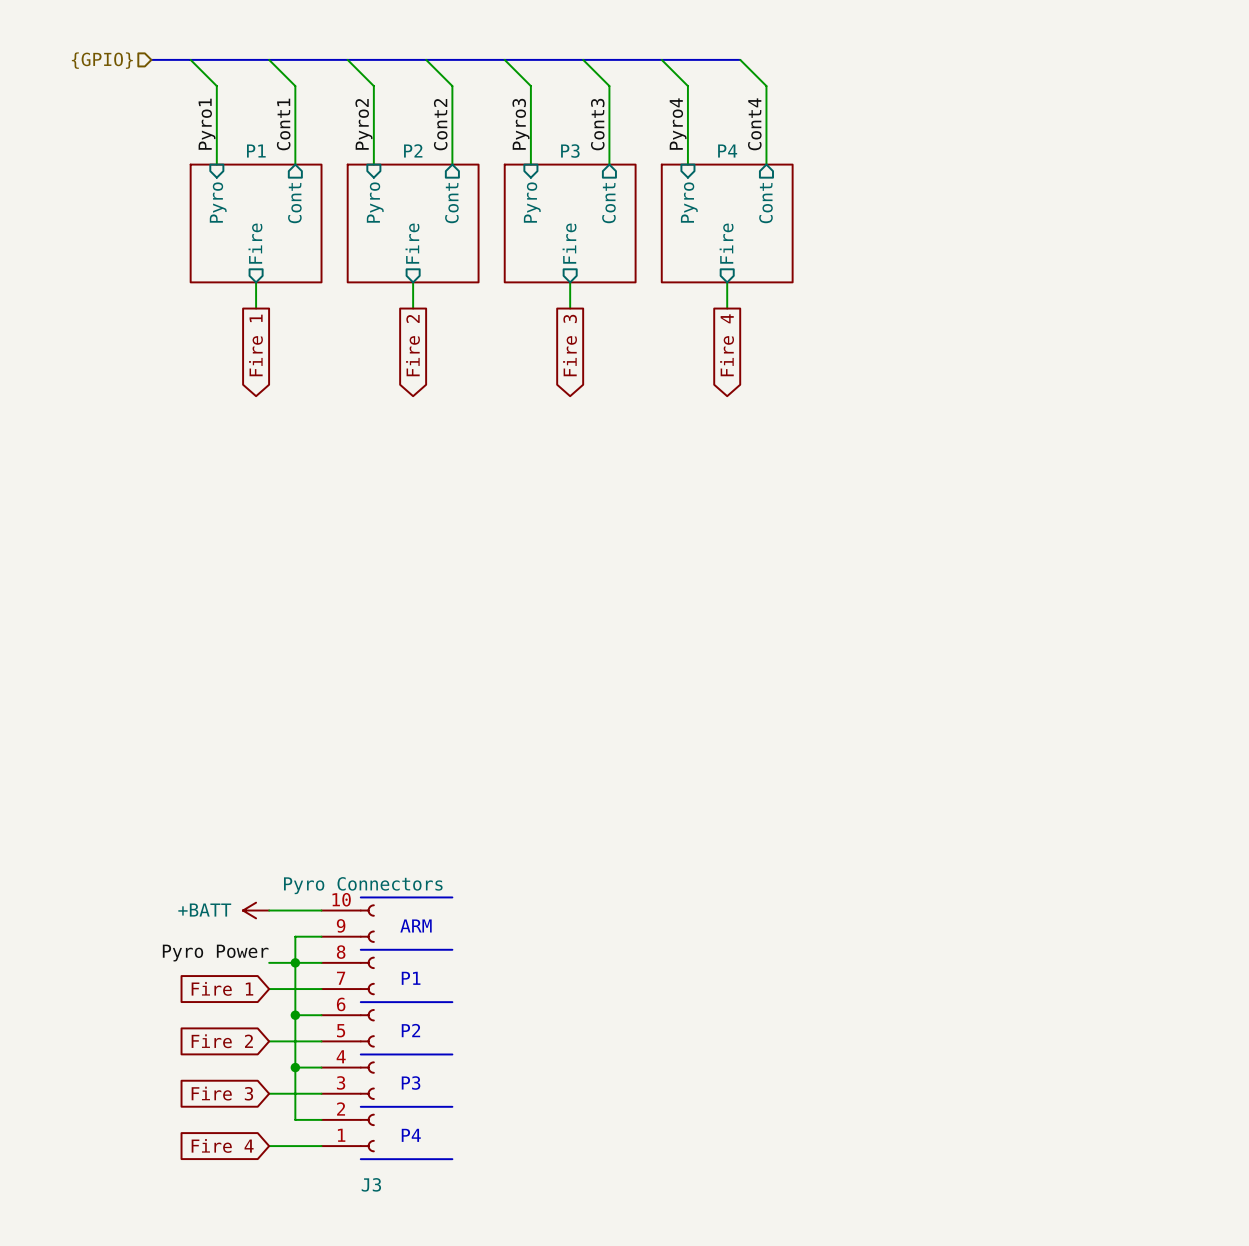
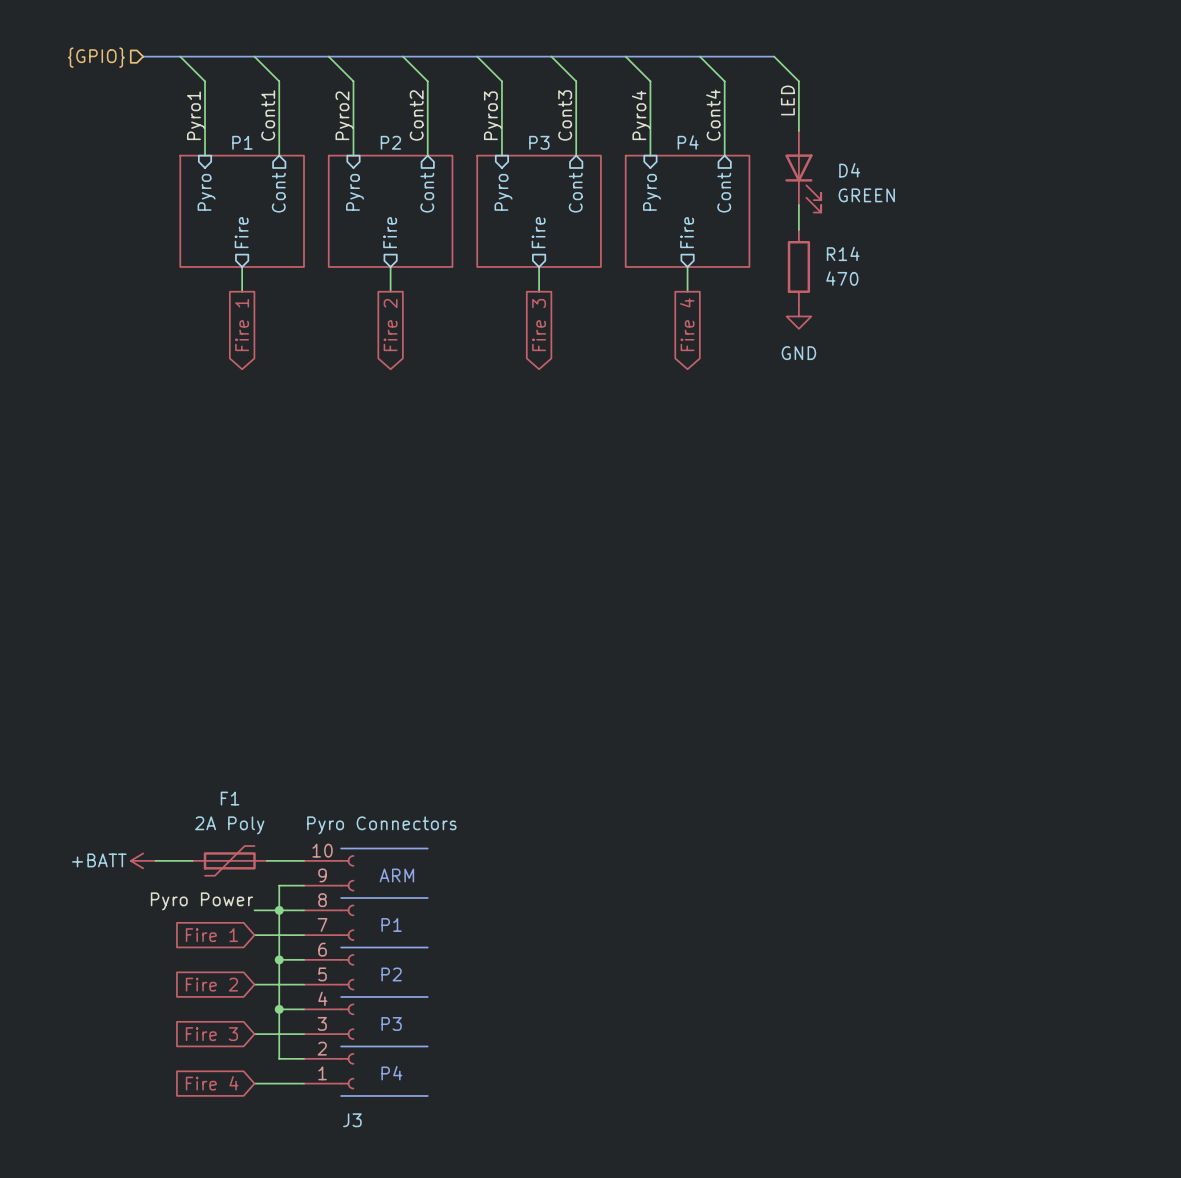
bus: none -> (699, 56) (774, 56)
wire: none -> (774, 56) (798, 81) (798, 130)
label: none -> LED (787, 100)
D4: none -> GREEN (803, 171)
wire: none -> (798, 205) (798, 229)
R14: none -> 470 (798, 266)
power symbol: none -> GND (798, 316)
J3 value position: Pyro Connectors (363, 885) -> Pyro Connectors (381, 825)
wire: none -> (155, 860) (192, 860)
F1: none -> 2A Poly (229, 860)
power symbol position: +BATT (256, 910) -> +BATT (143, 860)

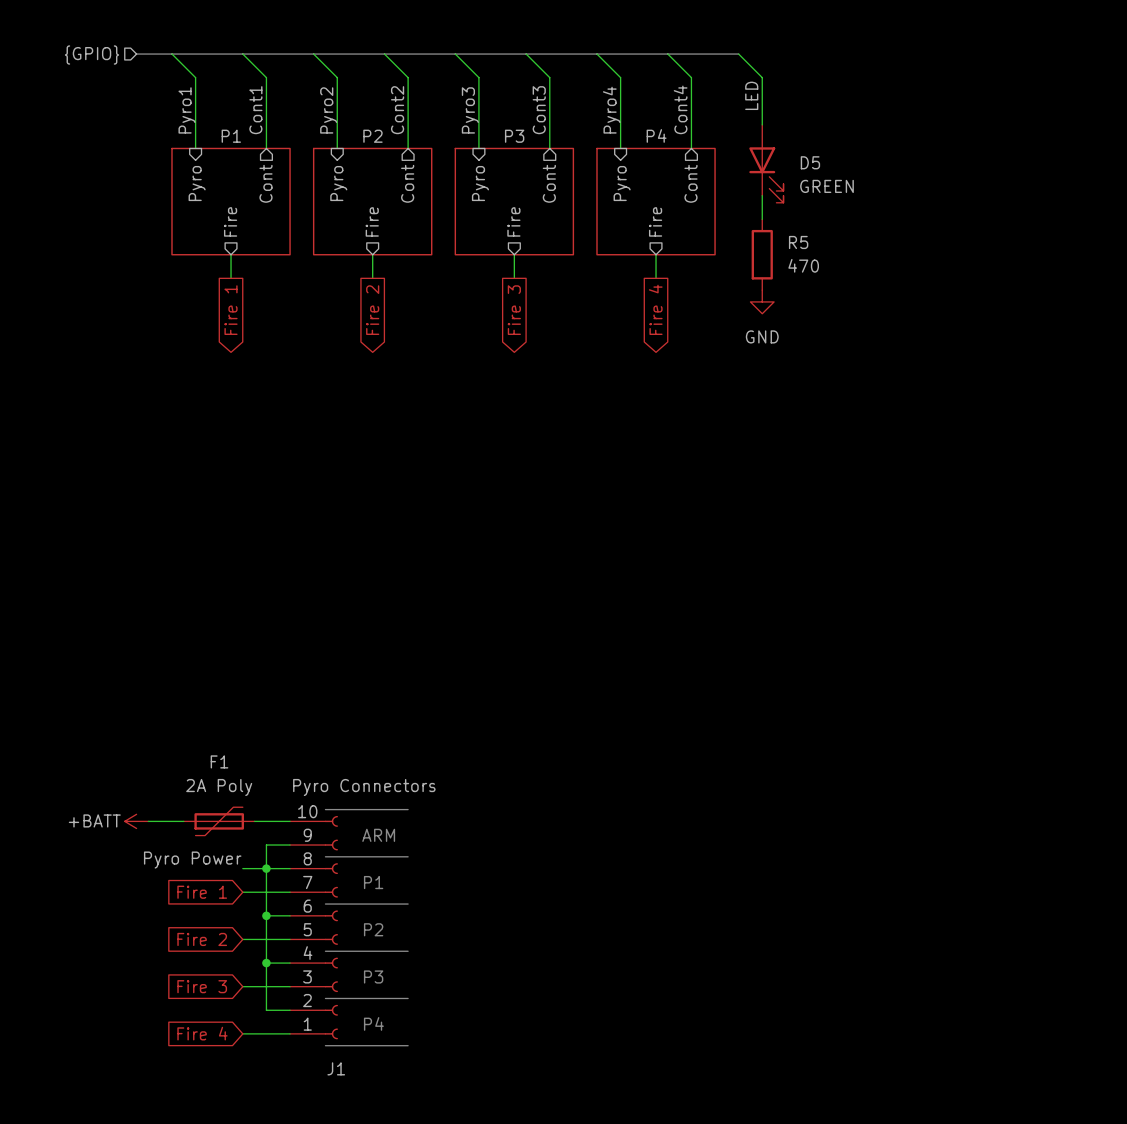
D4 name: D4 (849, 170) -> D5 (810, 162)
R14 name: R14 (843, 253) -> R5 (798, 242)
J3 name: J3 (352, 1120) -> J1 (336, 1068)

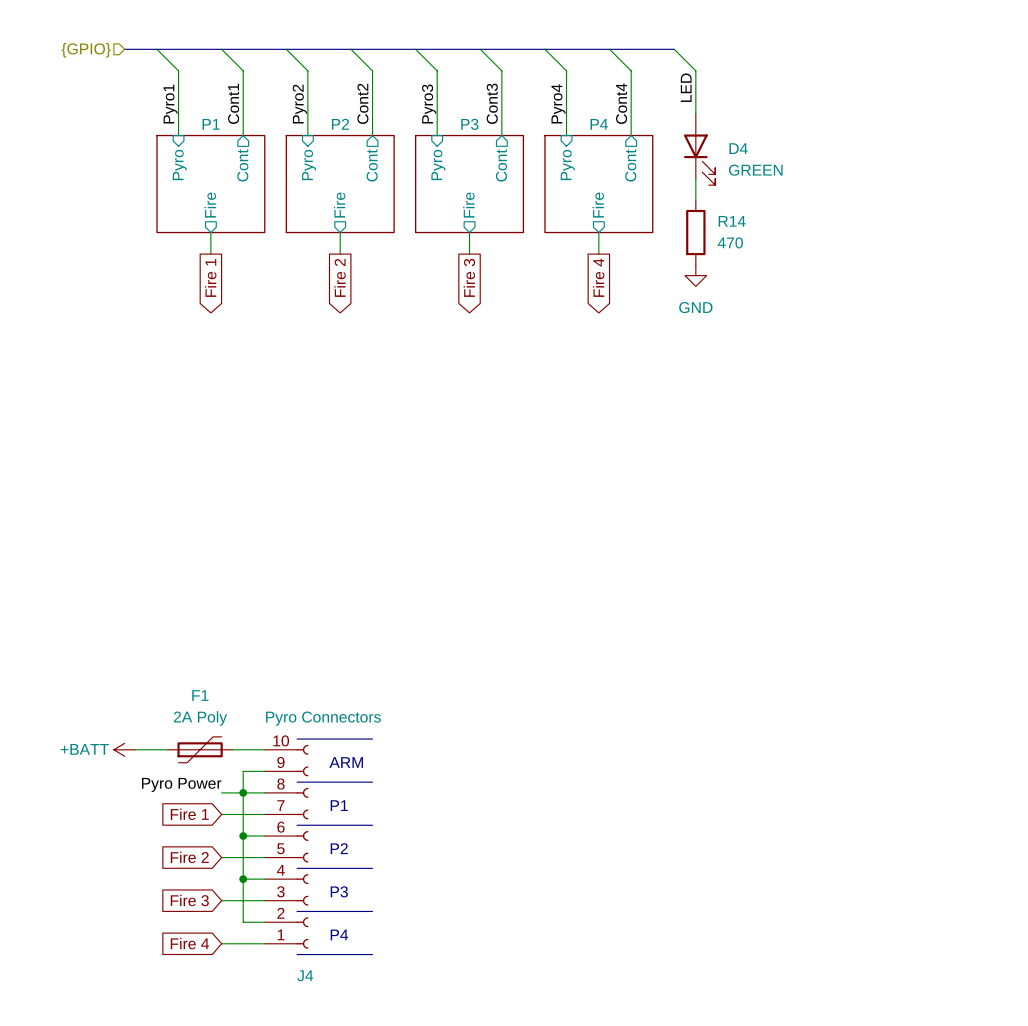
D5 name: D5 (810, 162) -> D4 (738, 148)
R5 name: R5 (798, 242) -> R14 (732, 221)
J1 name: J1 (336, 1068) -> J4 (305, 975)

